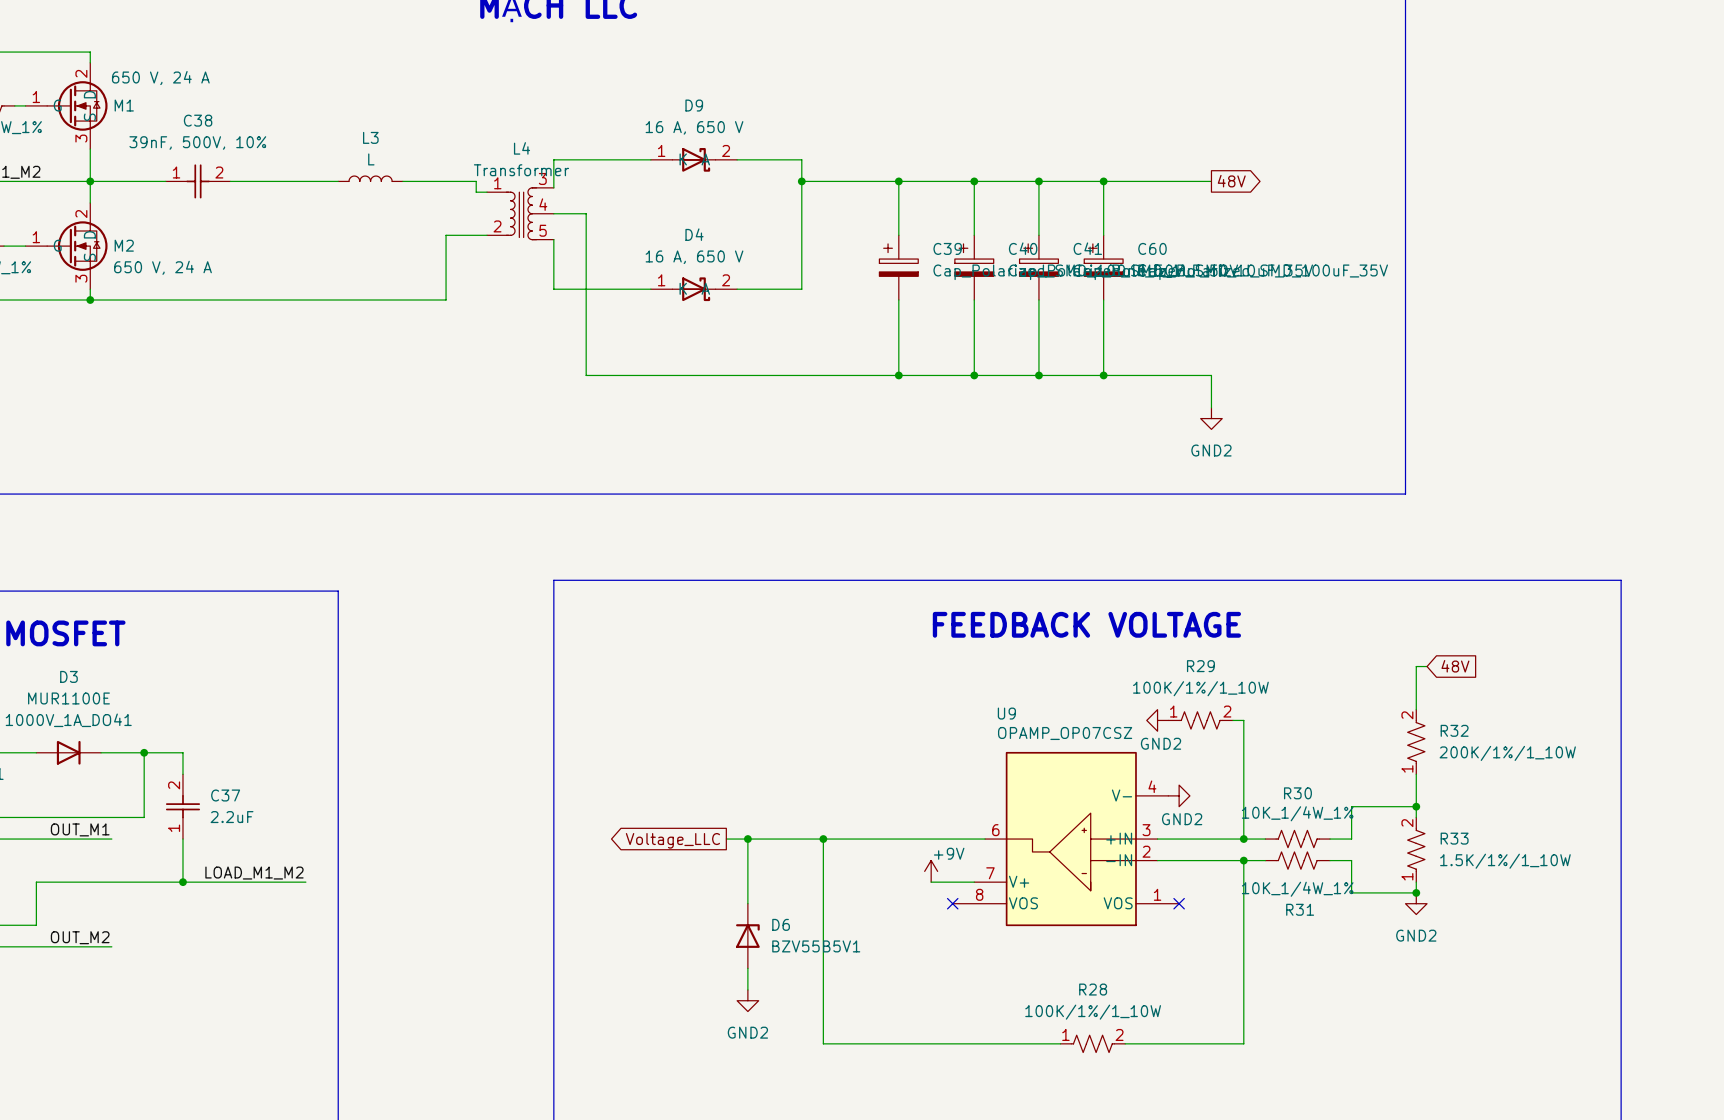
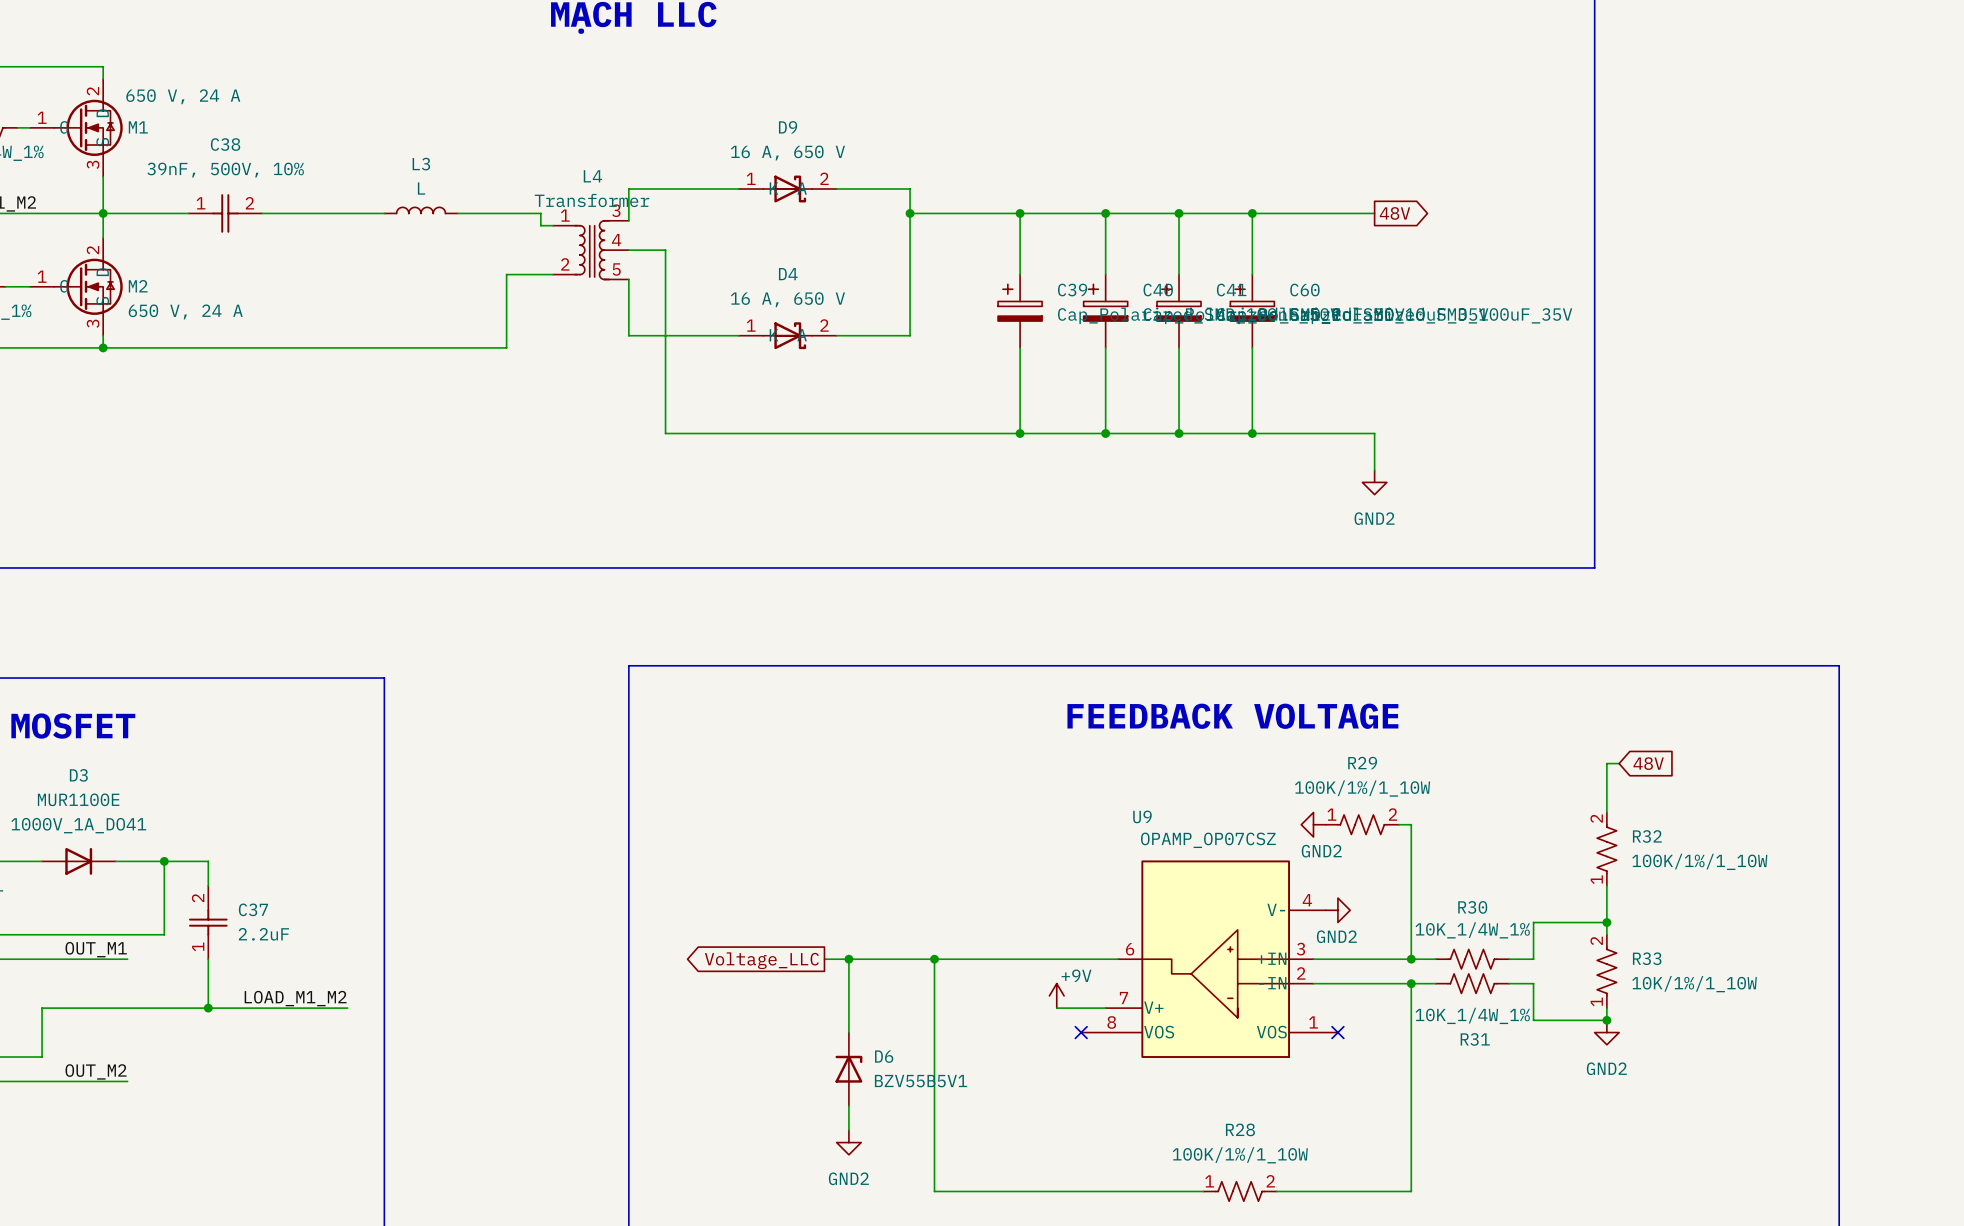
R32 value: 200K/1%/1_10W (1507, 753) -> 100K/1%/1_10W (1699, 861)
R33 value: 1.5K/1%/1_10W (1505, 861) -> 10K/1%/1_10W (1694, 984)

